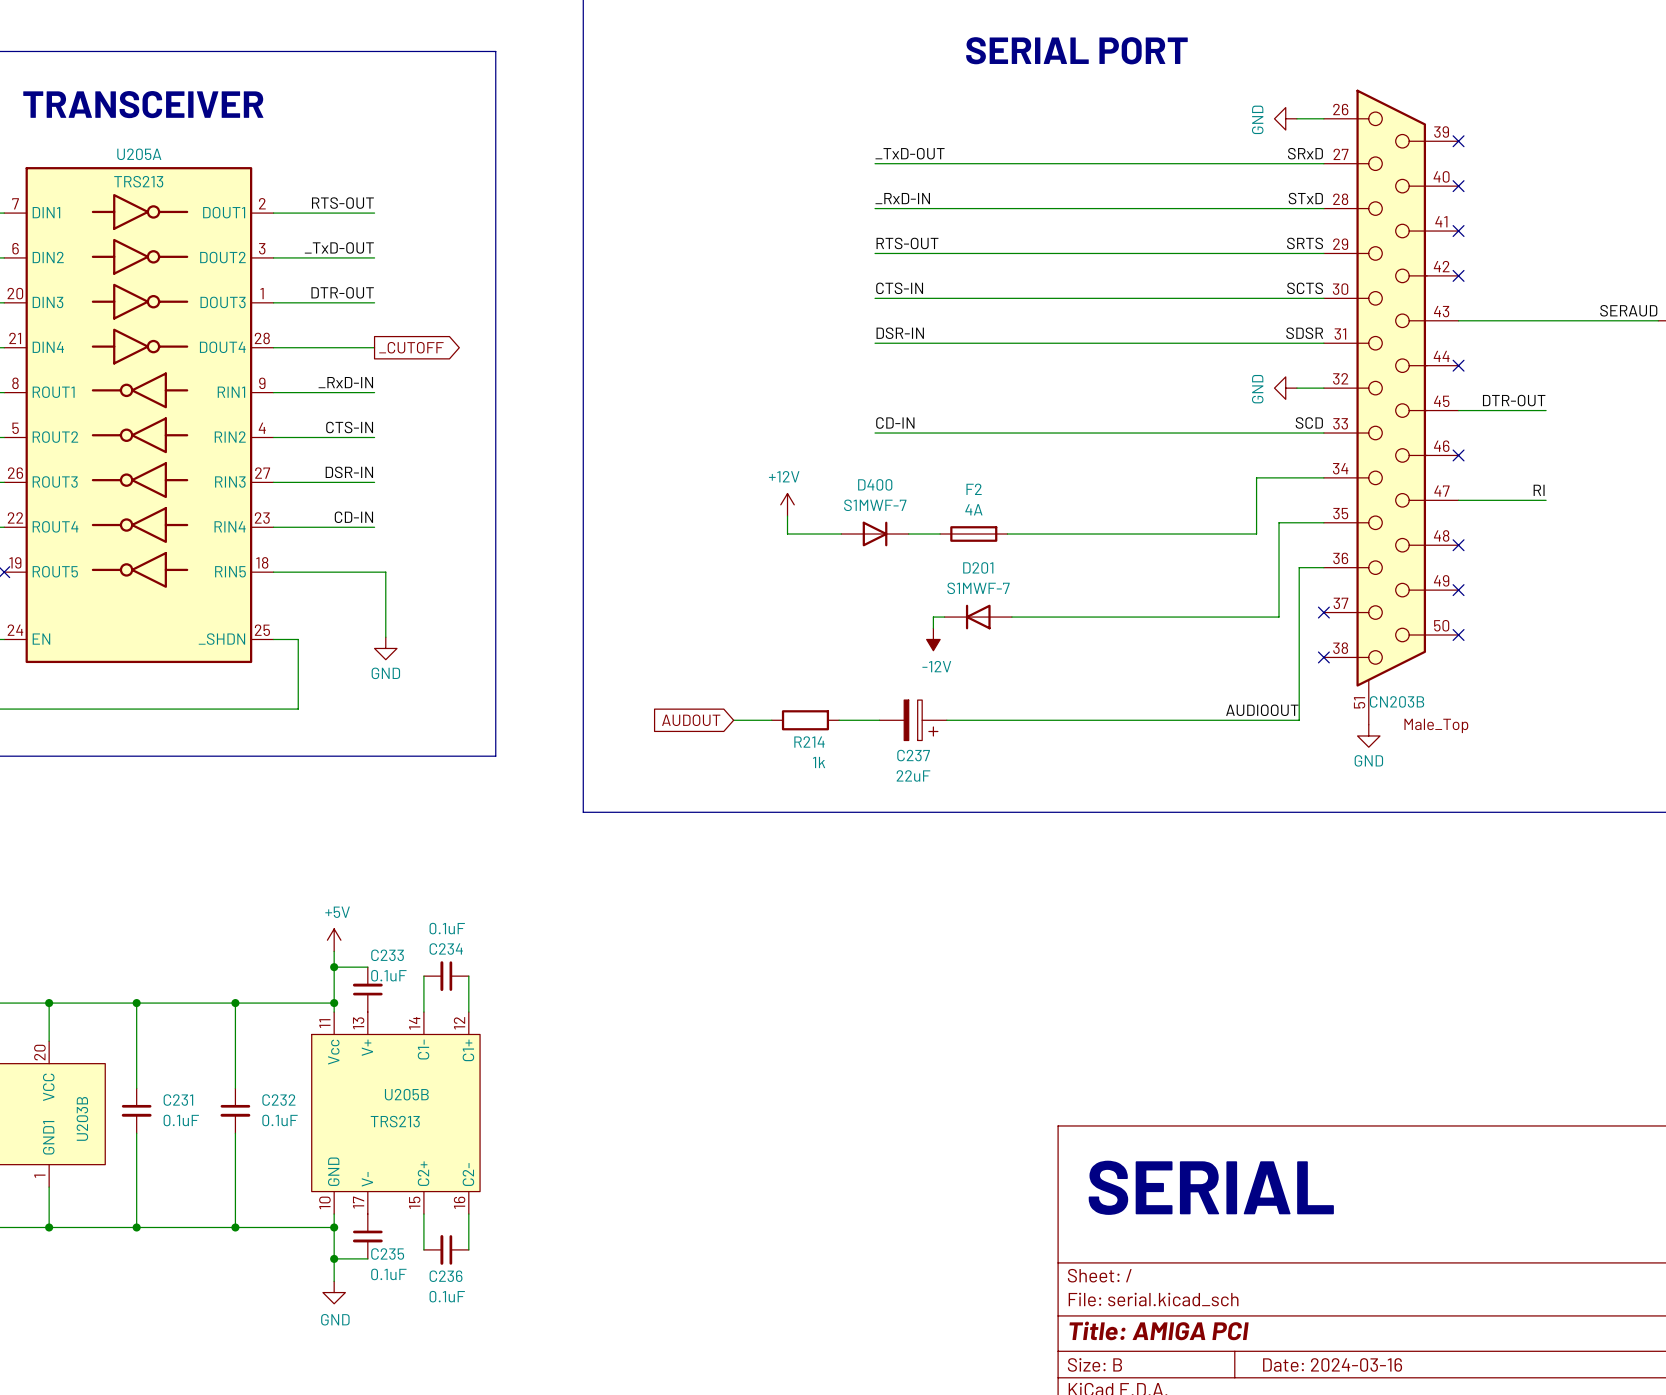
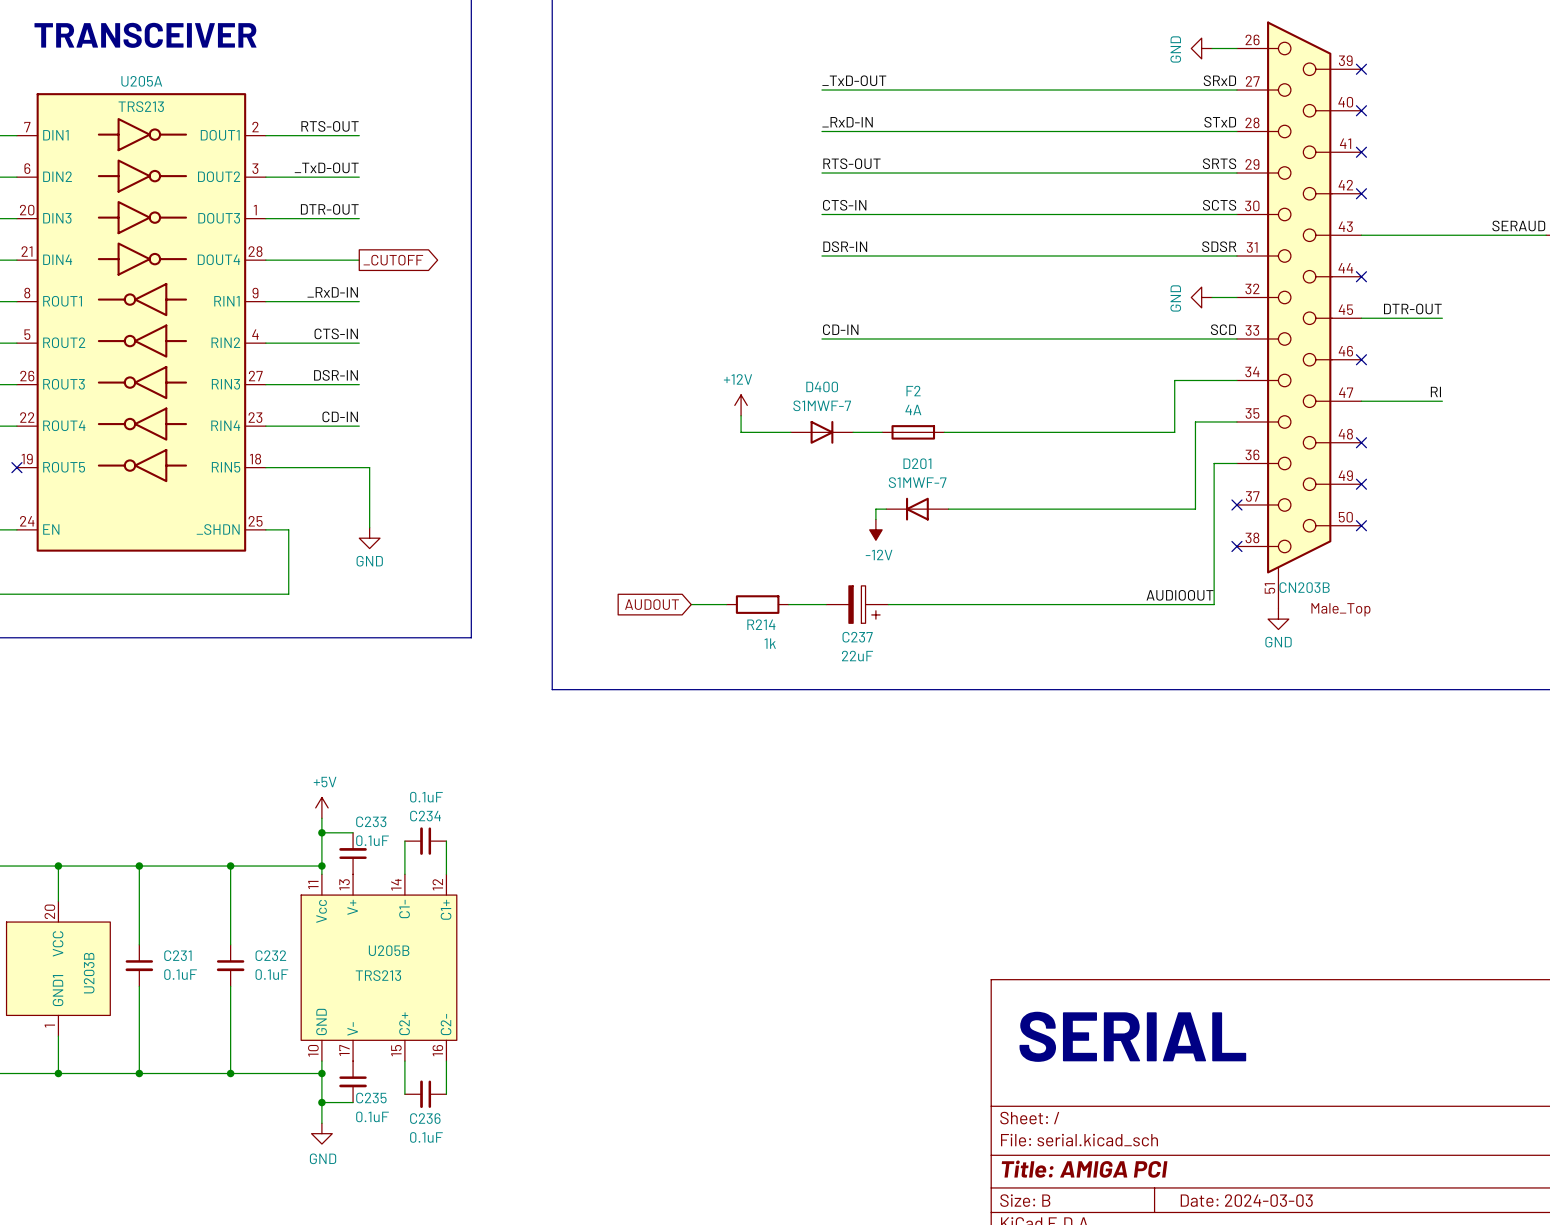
title block: Date: 2024-03-16 (1332, 1364) -> Date: 2024-03-03 (1246, 1200)

